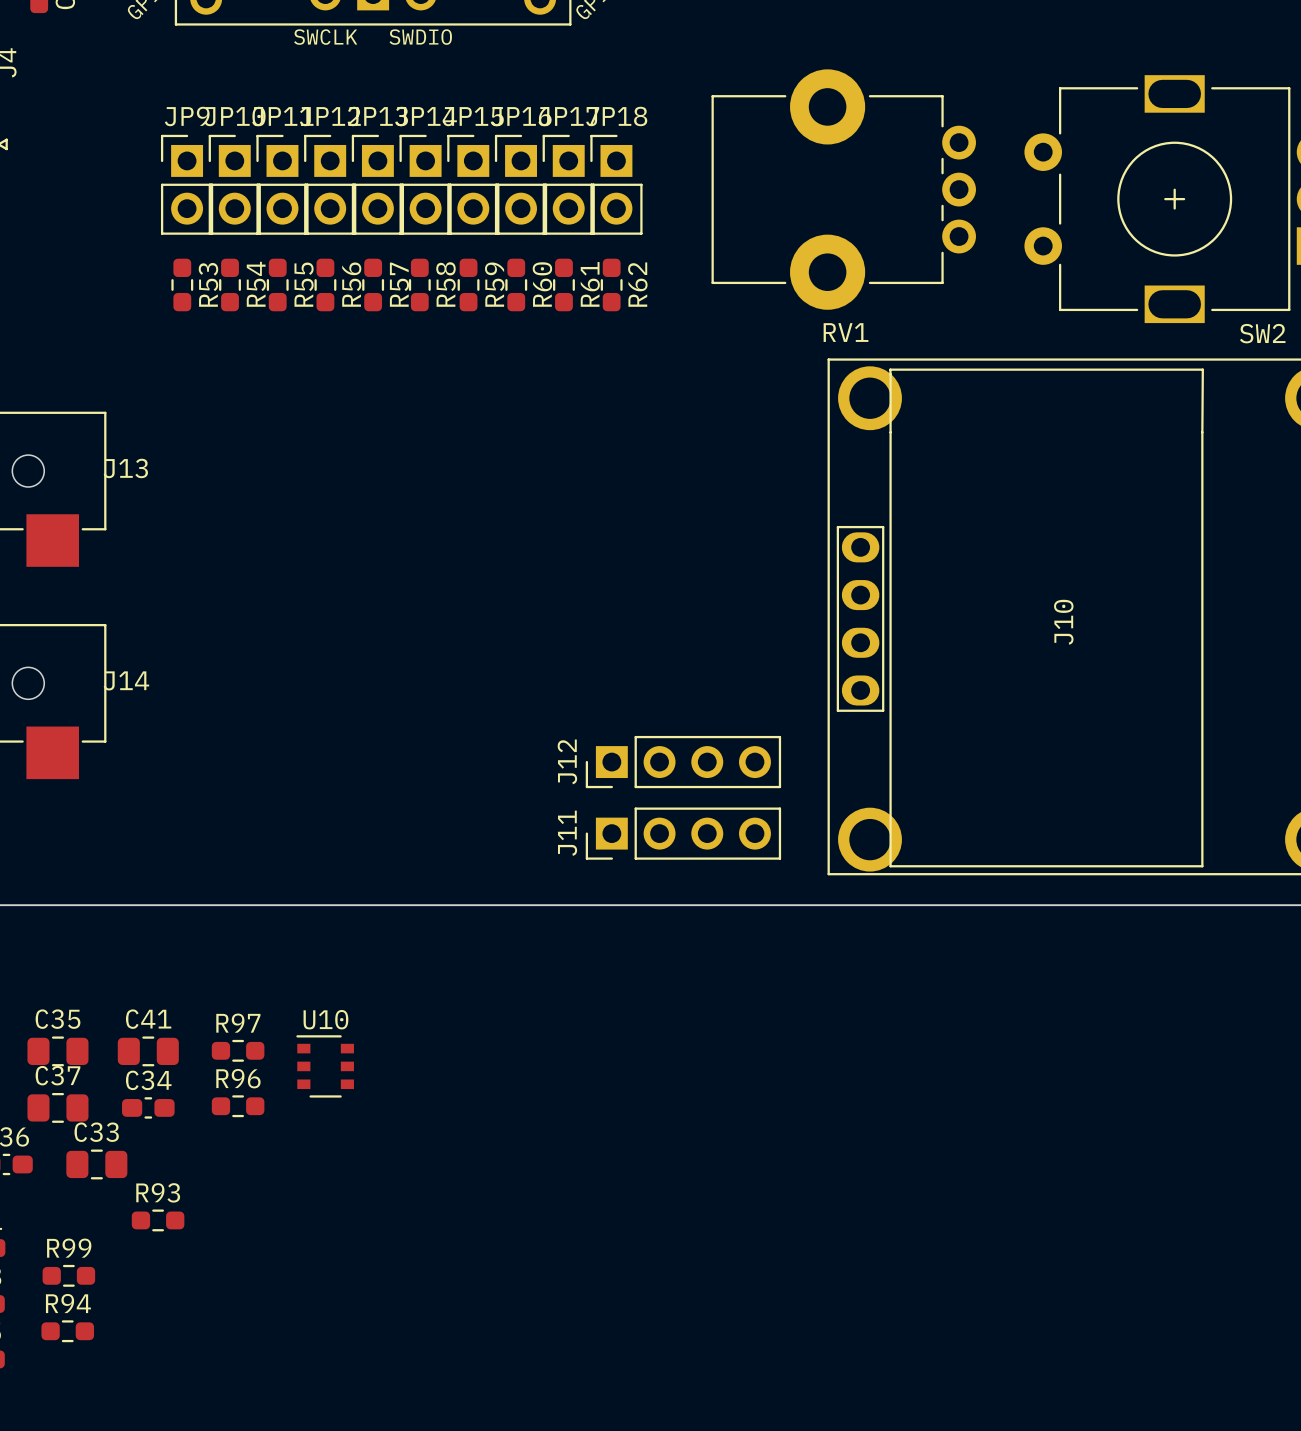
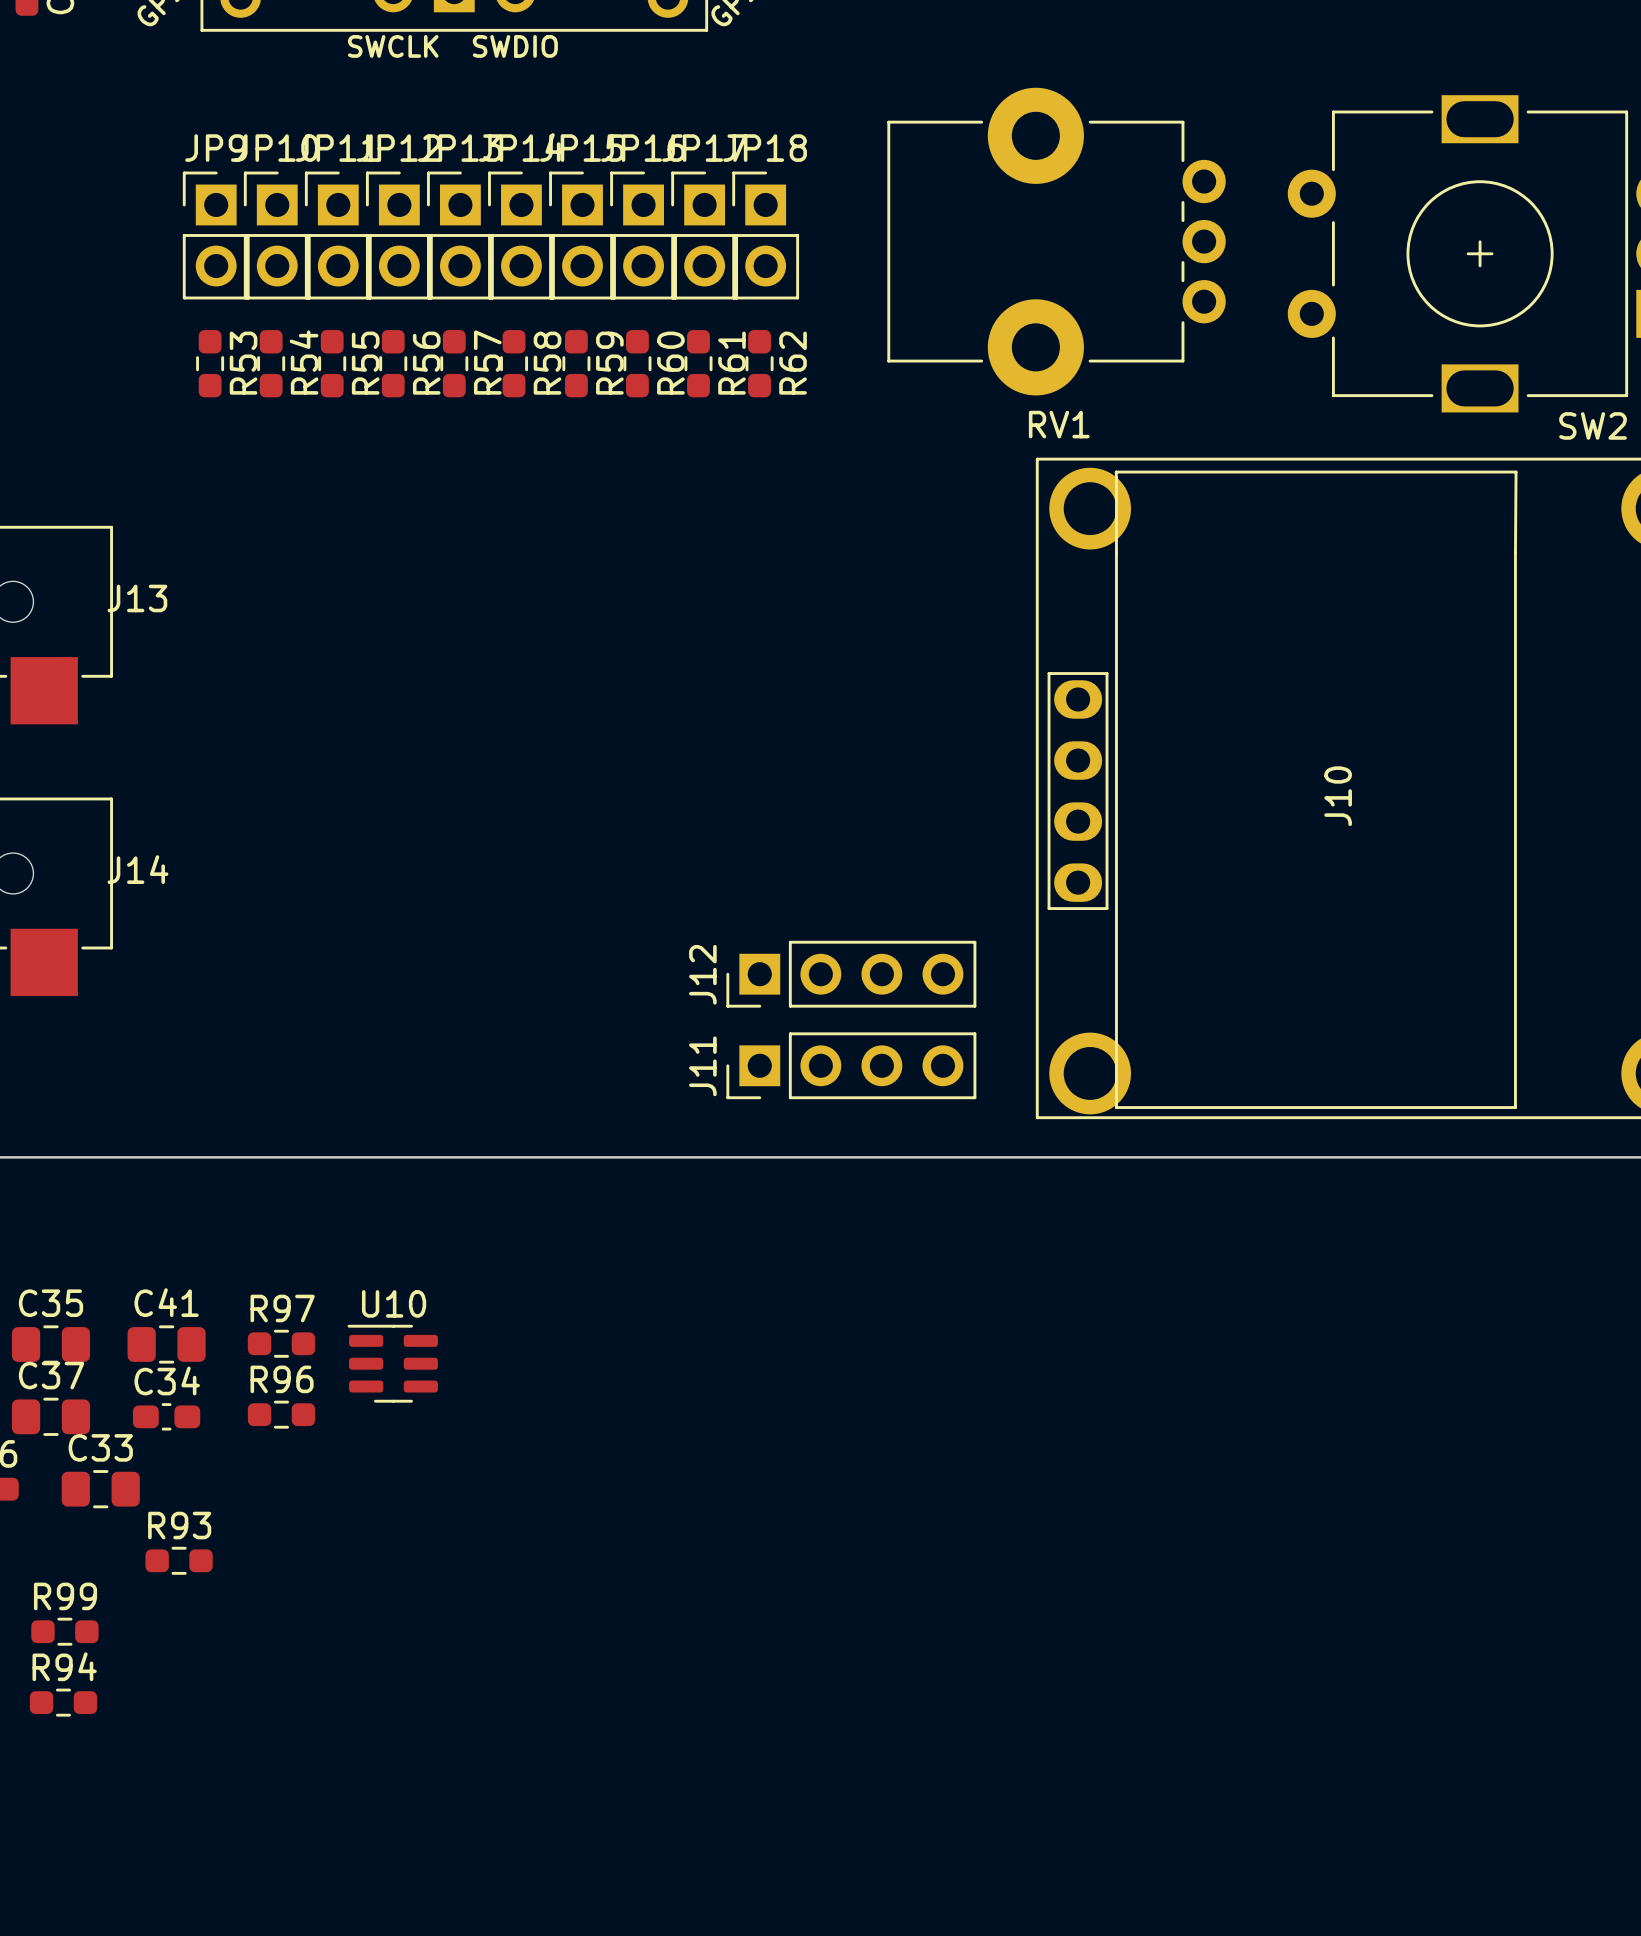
U10 footprint: [296, 1035, 354, 1098] -> [347, 1324, 438, 1403]

